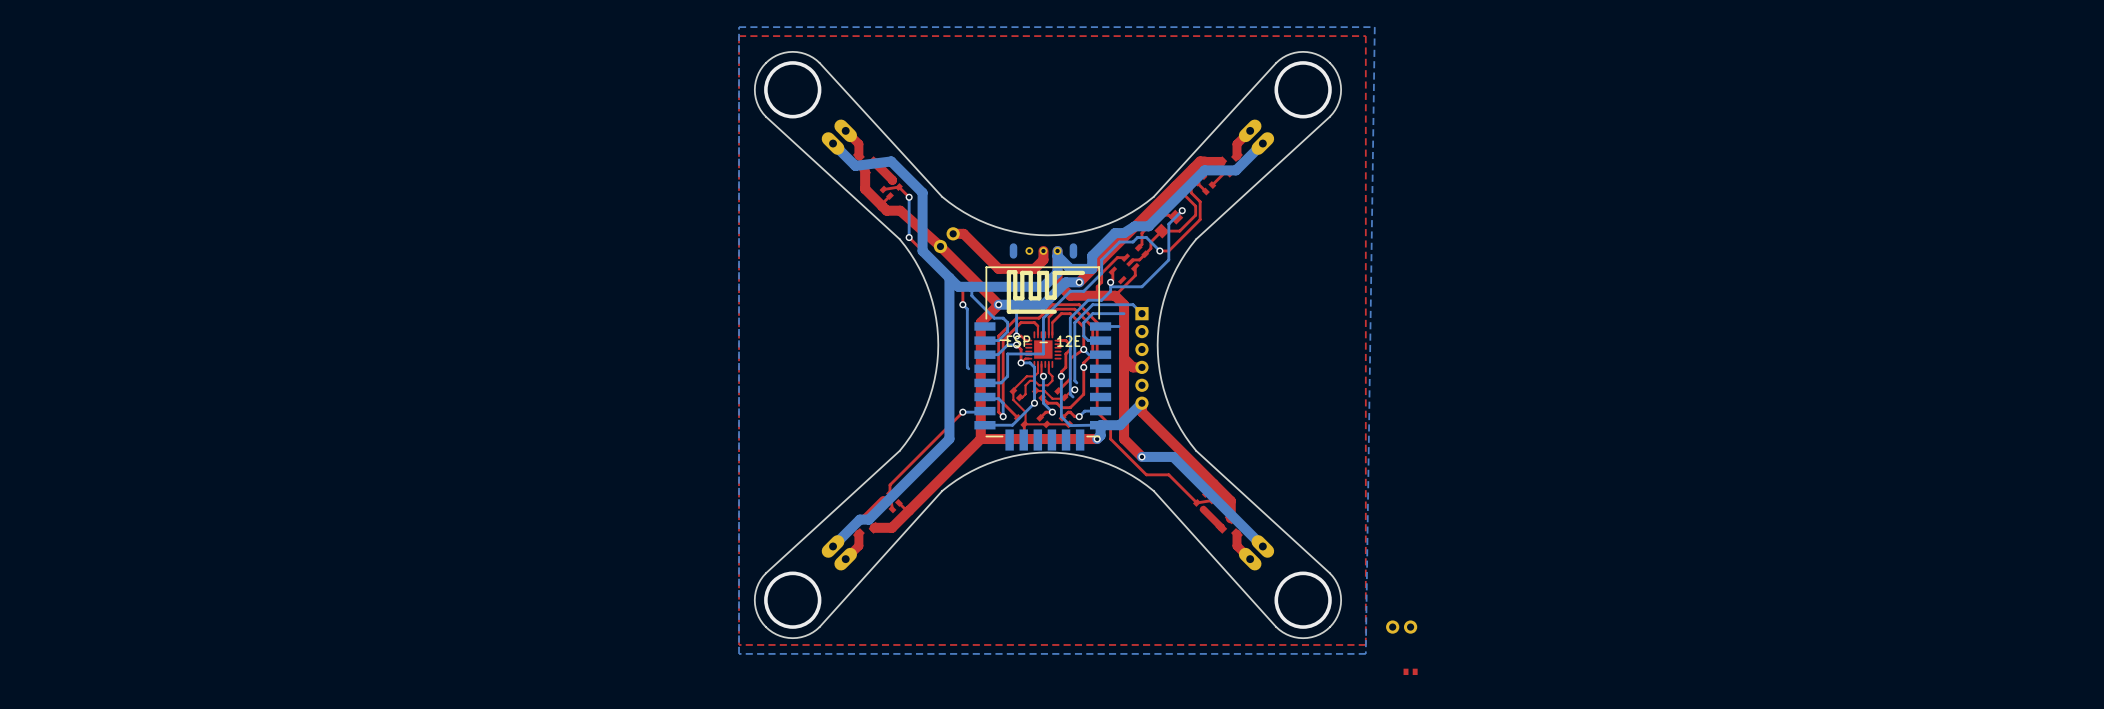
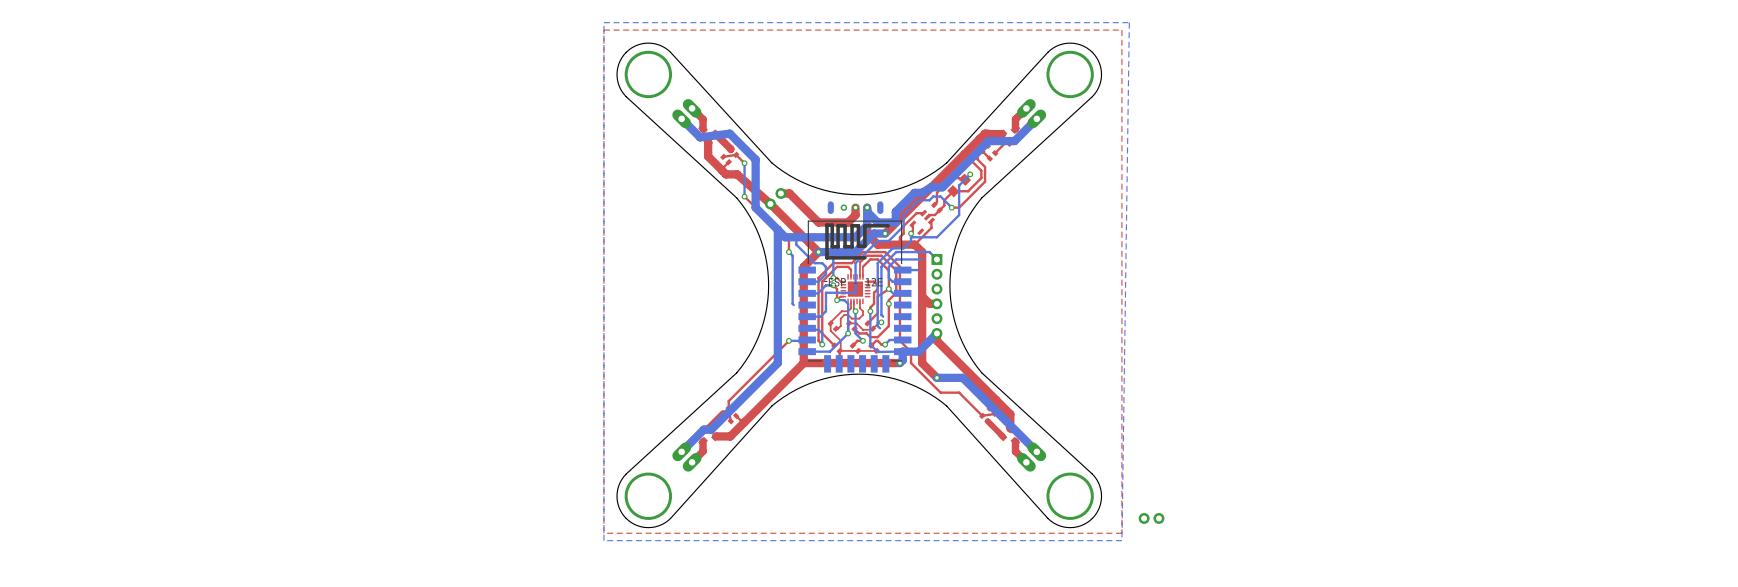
part: (1410, 671) -> none

